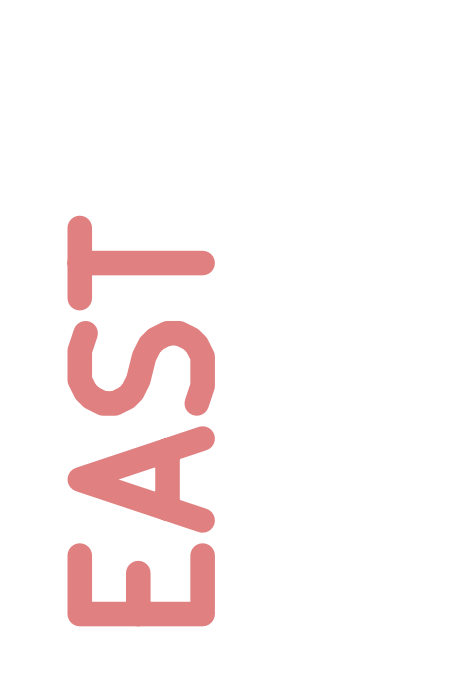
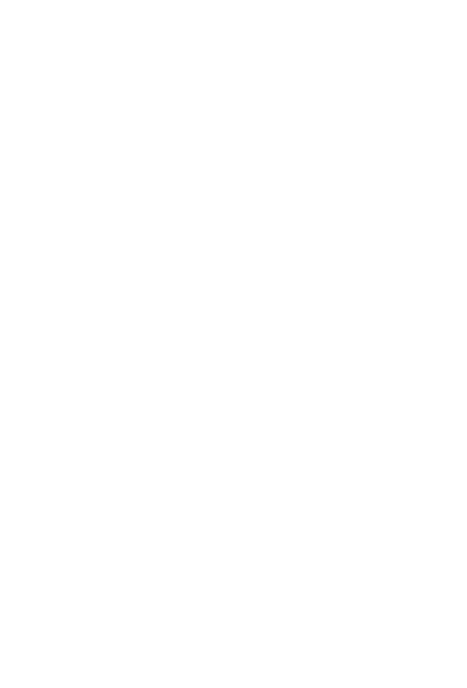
text: EAST (141, 421) -> none

